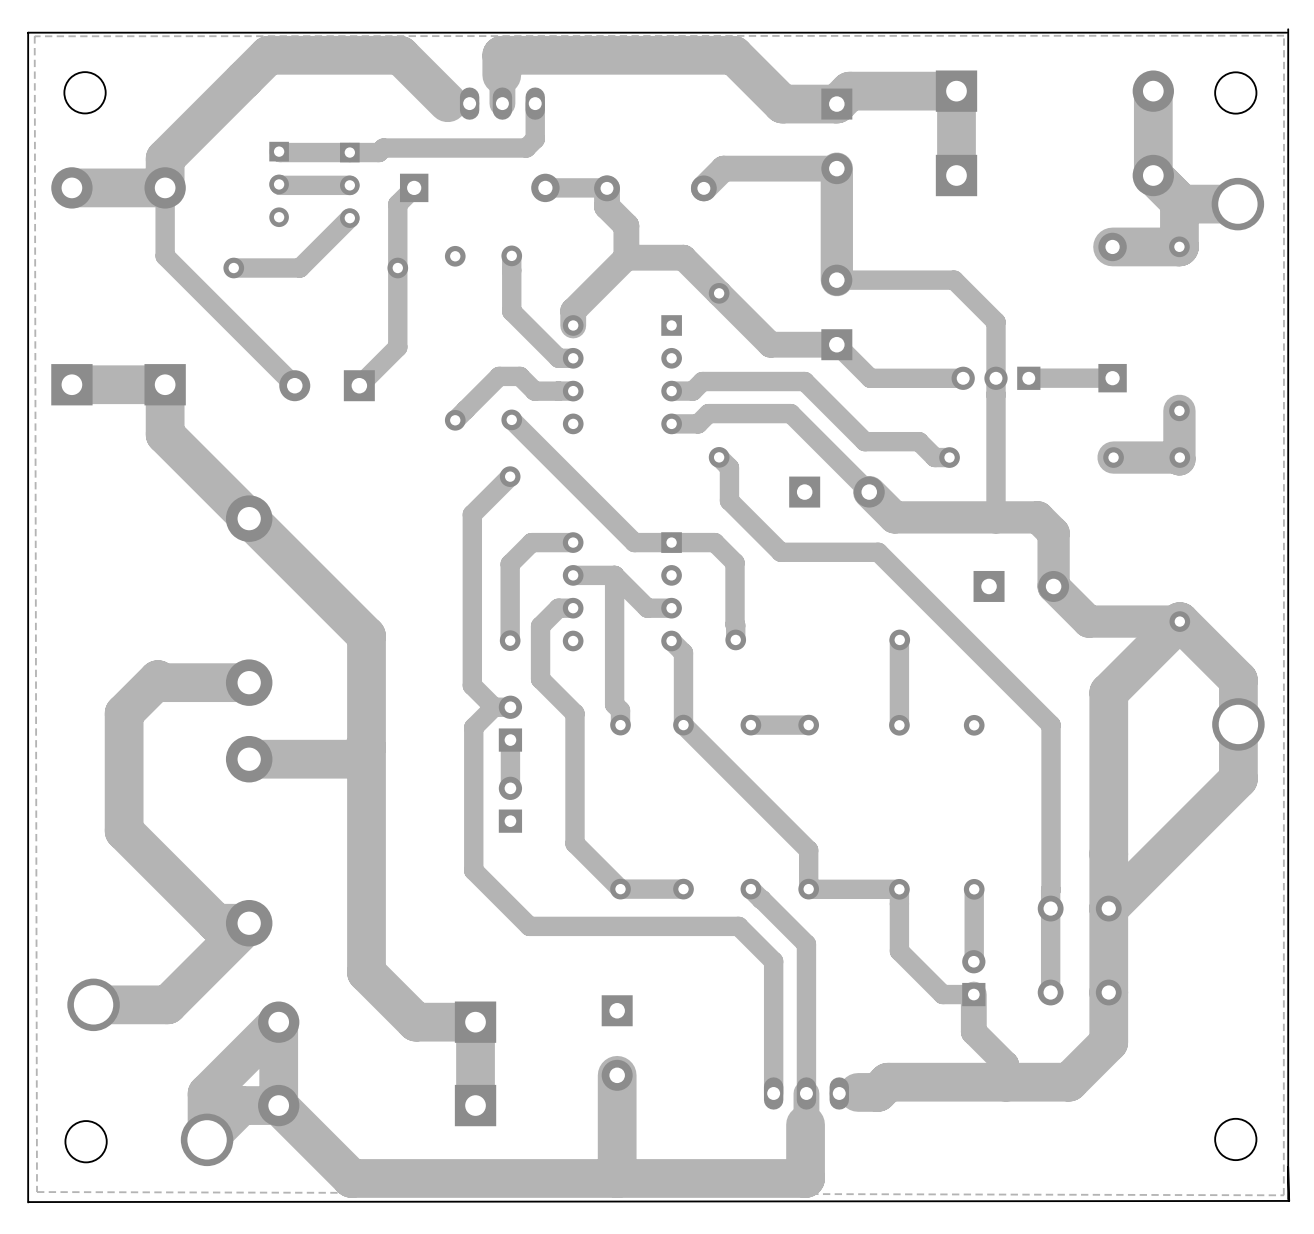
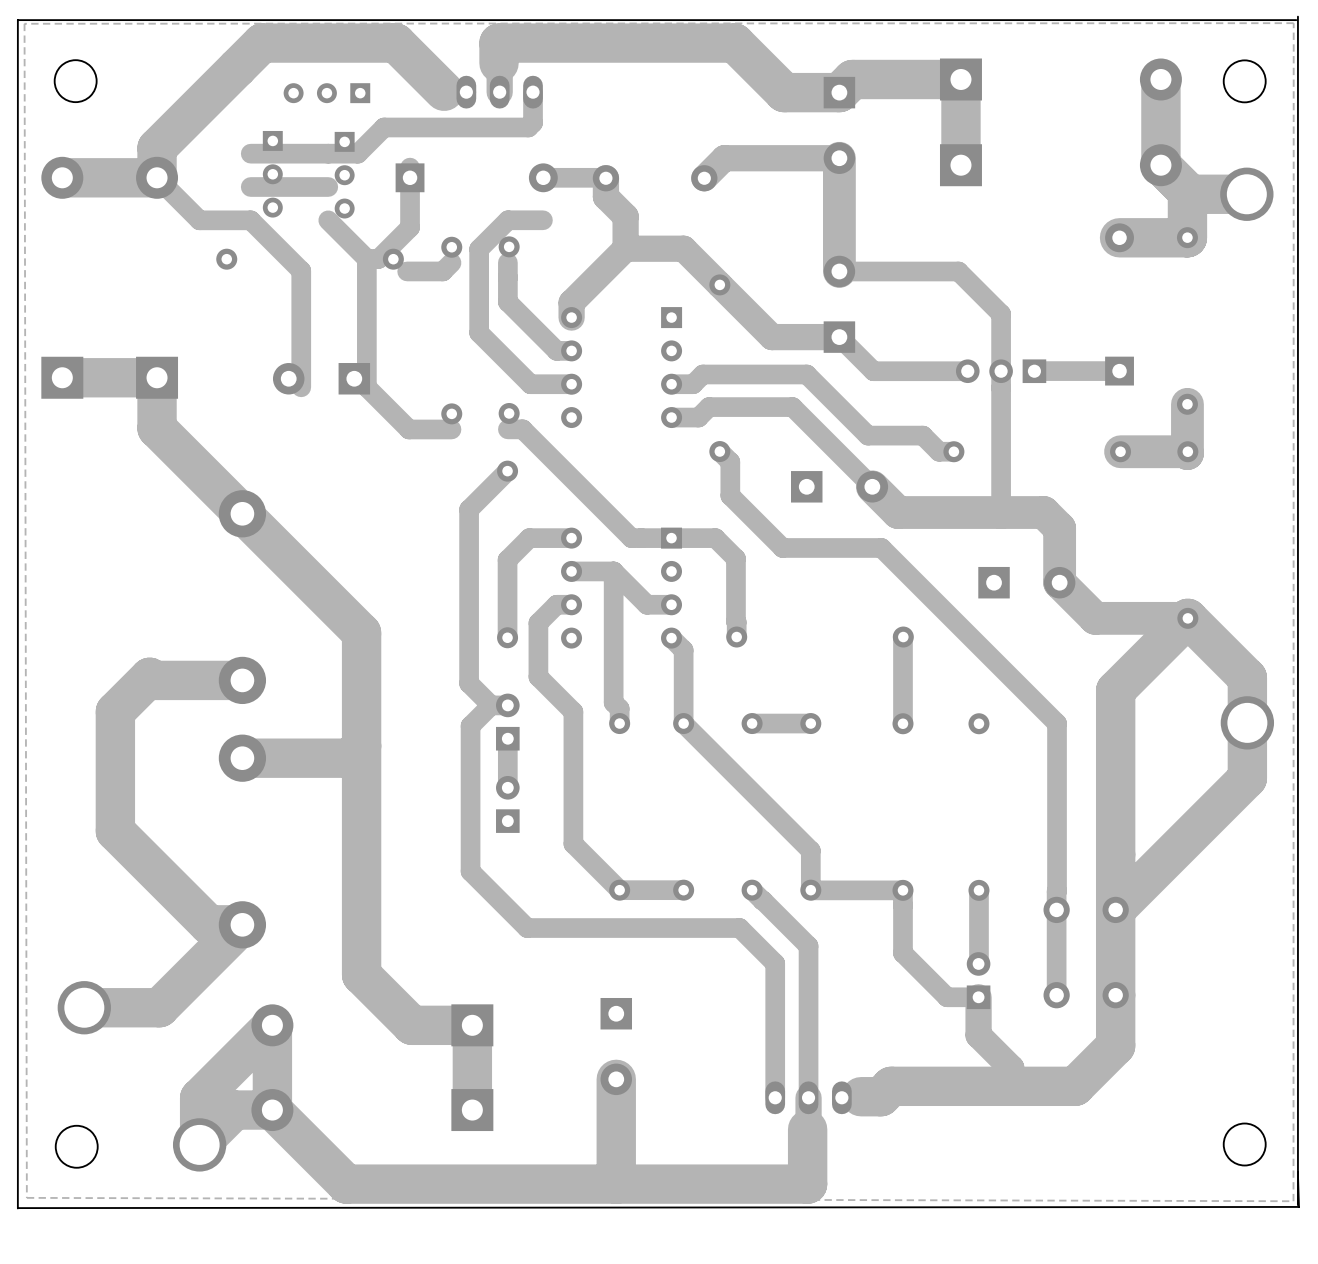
part: none -> (326, 93)
track: (535, 133) (535, 139) (526, 148) (383, 148) (379, 152) (279, 151) -> (533, 122) (528, 127) (384, 127) (357, 153) (250, 153)
track: none -> (410, 167) (410, 227) (378, 258) (366, 258)
track: (279, 184) (349, 185) -> none
track: (165, 187) (165, 256) (294, 385) -> (157, 177) (199, 220) (250, 220) (301, 270) (301, 387)
track: (414, 187) (397, 204) (397, 347) (359, 385) -> none
track: none -> (328, 187) (250, 187)
track: (349, 218) (299, 268) (233, 268) -> none
track: none -> (328, 220) (366, 258)
track: (511, 255) (511, 311) -> (507, 262) (509, 303)
track: none -> (366, 258) (366, 387) (409, 429) (451, 429)
track: none -> (451, 262) (442, 271) (407, 271)
track: (558, 391) (534, 391) (520, 376) (499, 376) (455, 420) -> (556, 384) (530, 384) (479, 332) (479, 249) (508, 220) (542, 220)
track: (511, 419) (634, 542) -> (507, 429) (522, 429) (631, 538) (633, 538)

